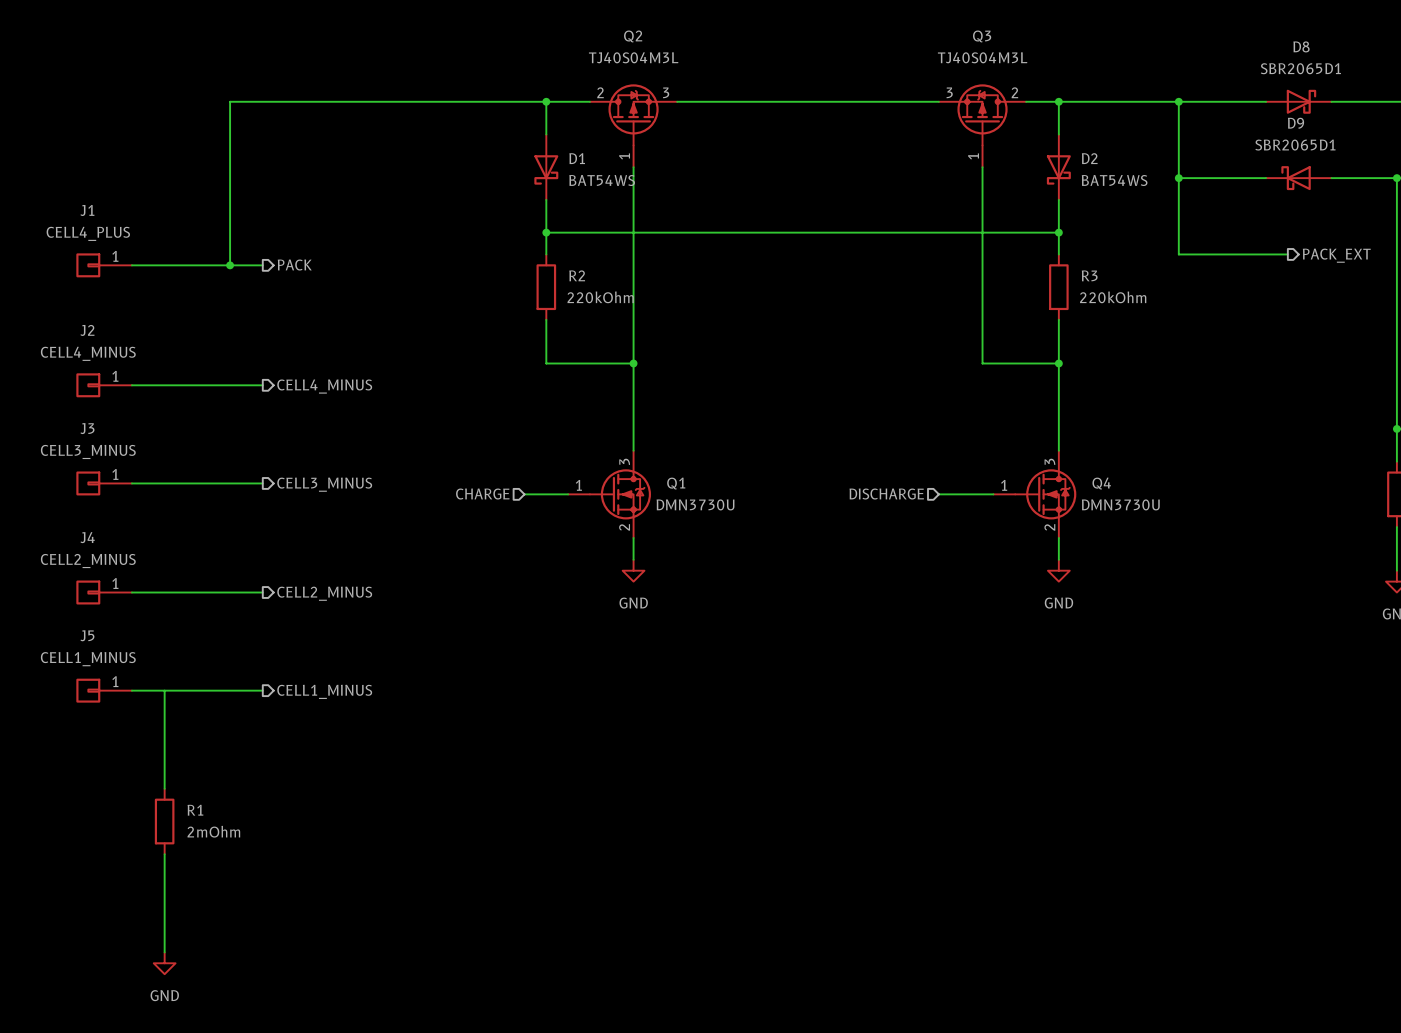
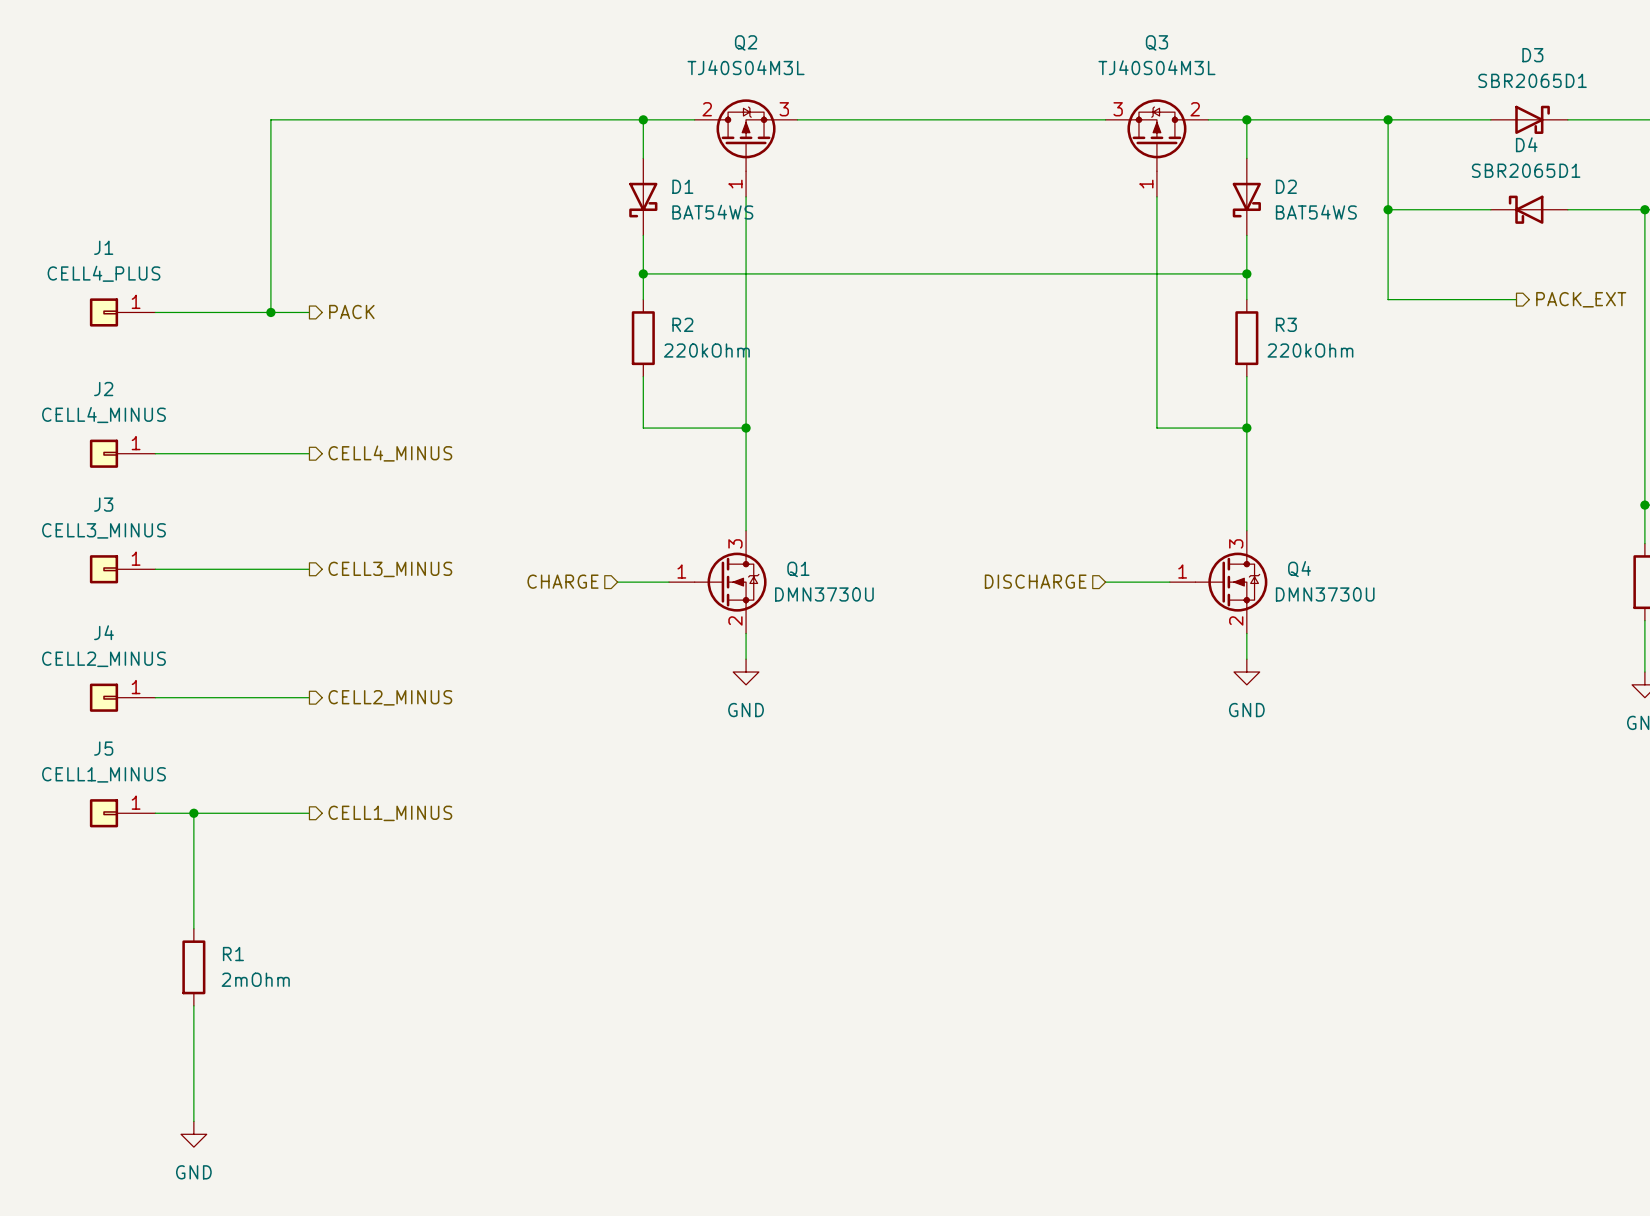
D8 name: D8 (1301, 46) -> D3 (1532, 55)
D9 name: D9 (1296, 123) -> D4 (1526, 144)
junction: none -> (193, 813)

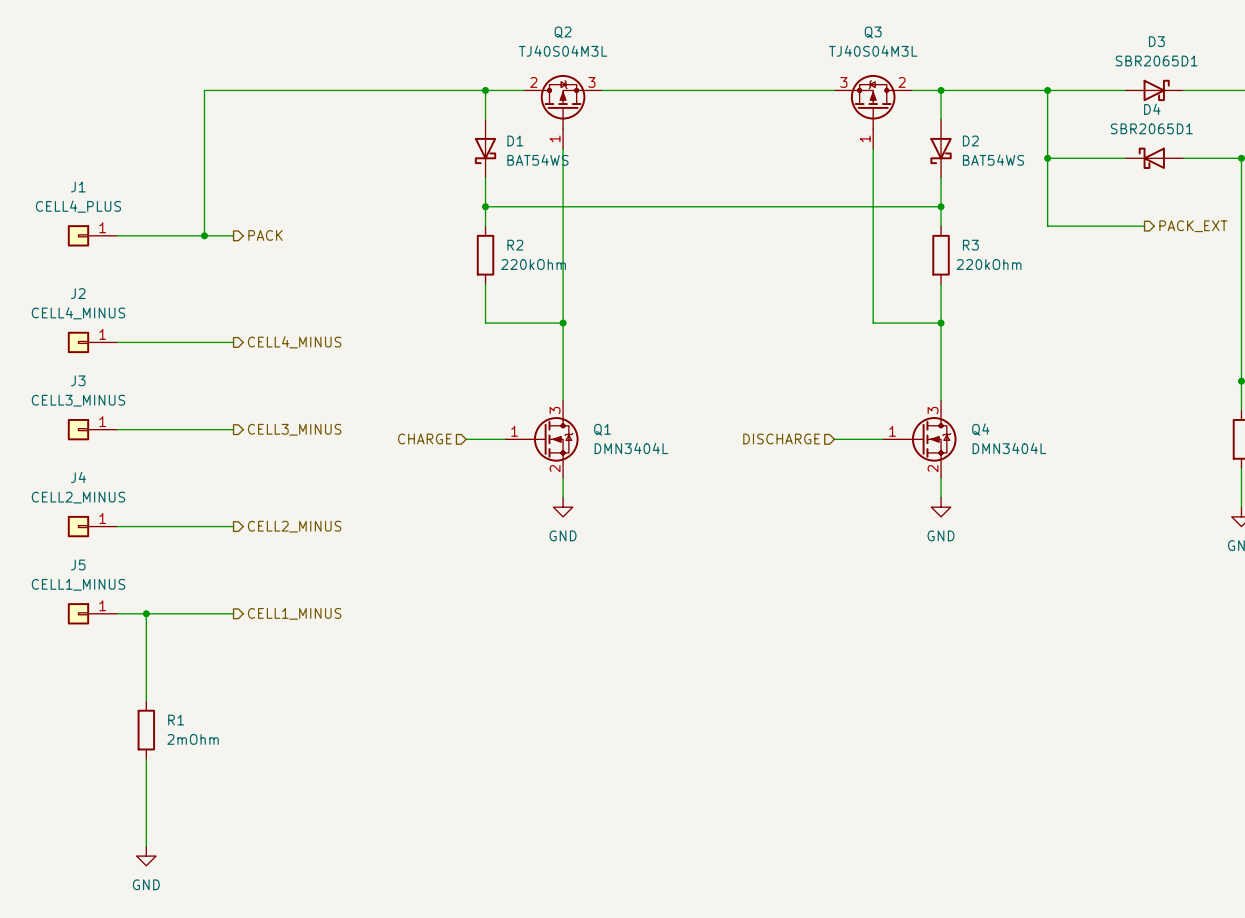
Q1 value: DMN3730U (824, 594) -> DMN3404L (631, 448)
Q4 value: DMN3730U (1325, 594) -> DMN3404L (1009, 448)

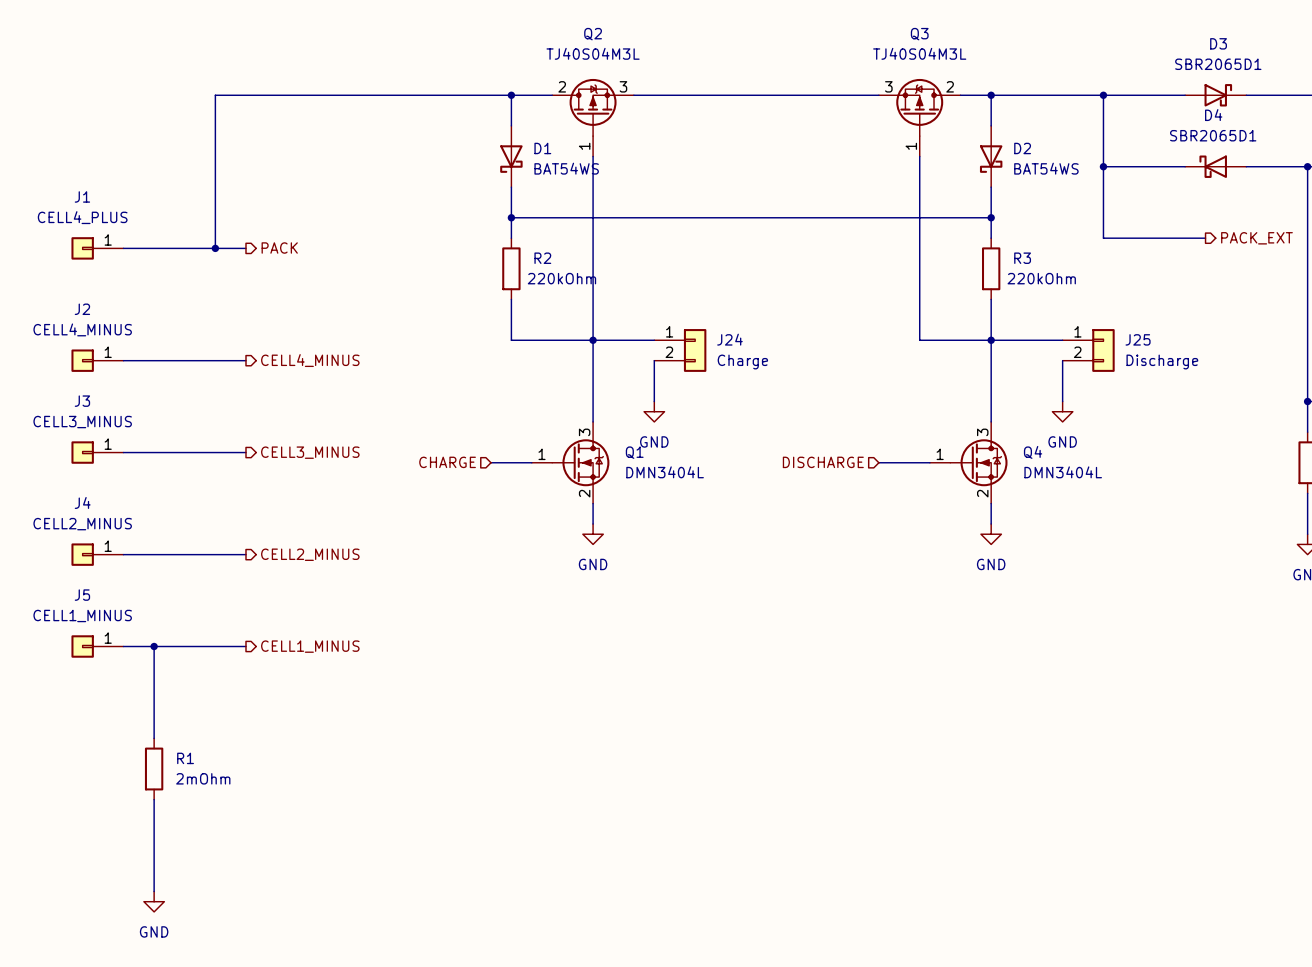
wire: none -> (593, 340) (654, 340)
wire: none -> (991, 340) (1062, 340)
J24: none -> Charge (680, 350)
J25: none -> Discharge (1088, 350)
wire: none -> (654, 360) (654, 401)
wire: none -> (1062, 360) (1062, 401)
power symbol: none -> GND (654, 411)
power symbol: none -> GND (1062, 411)

